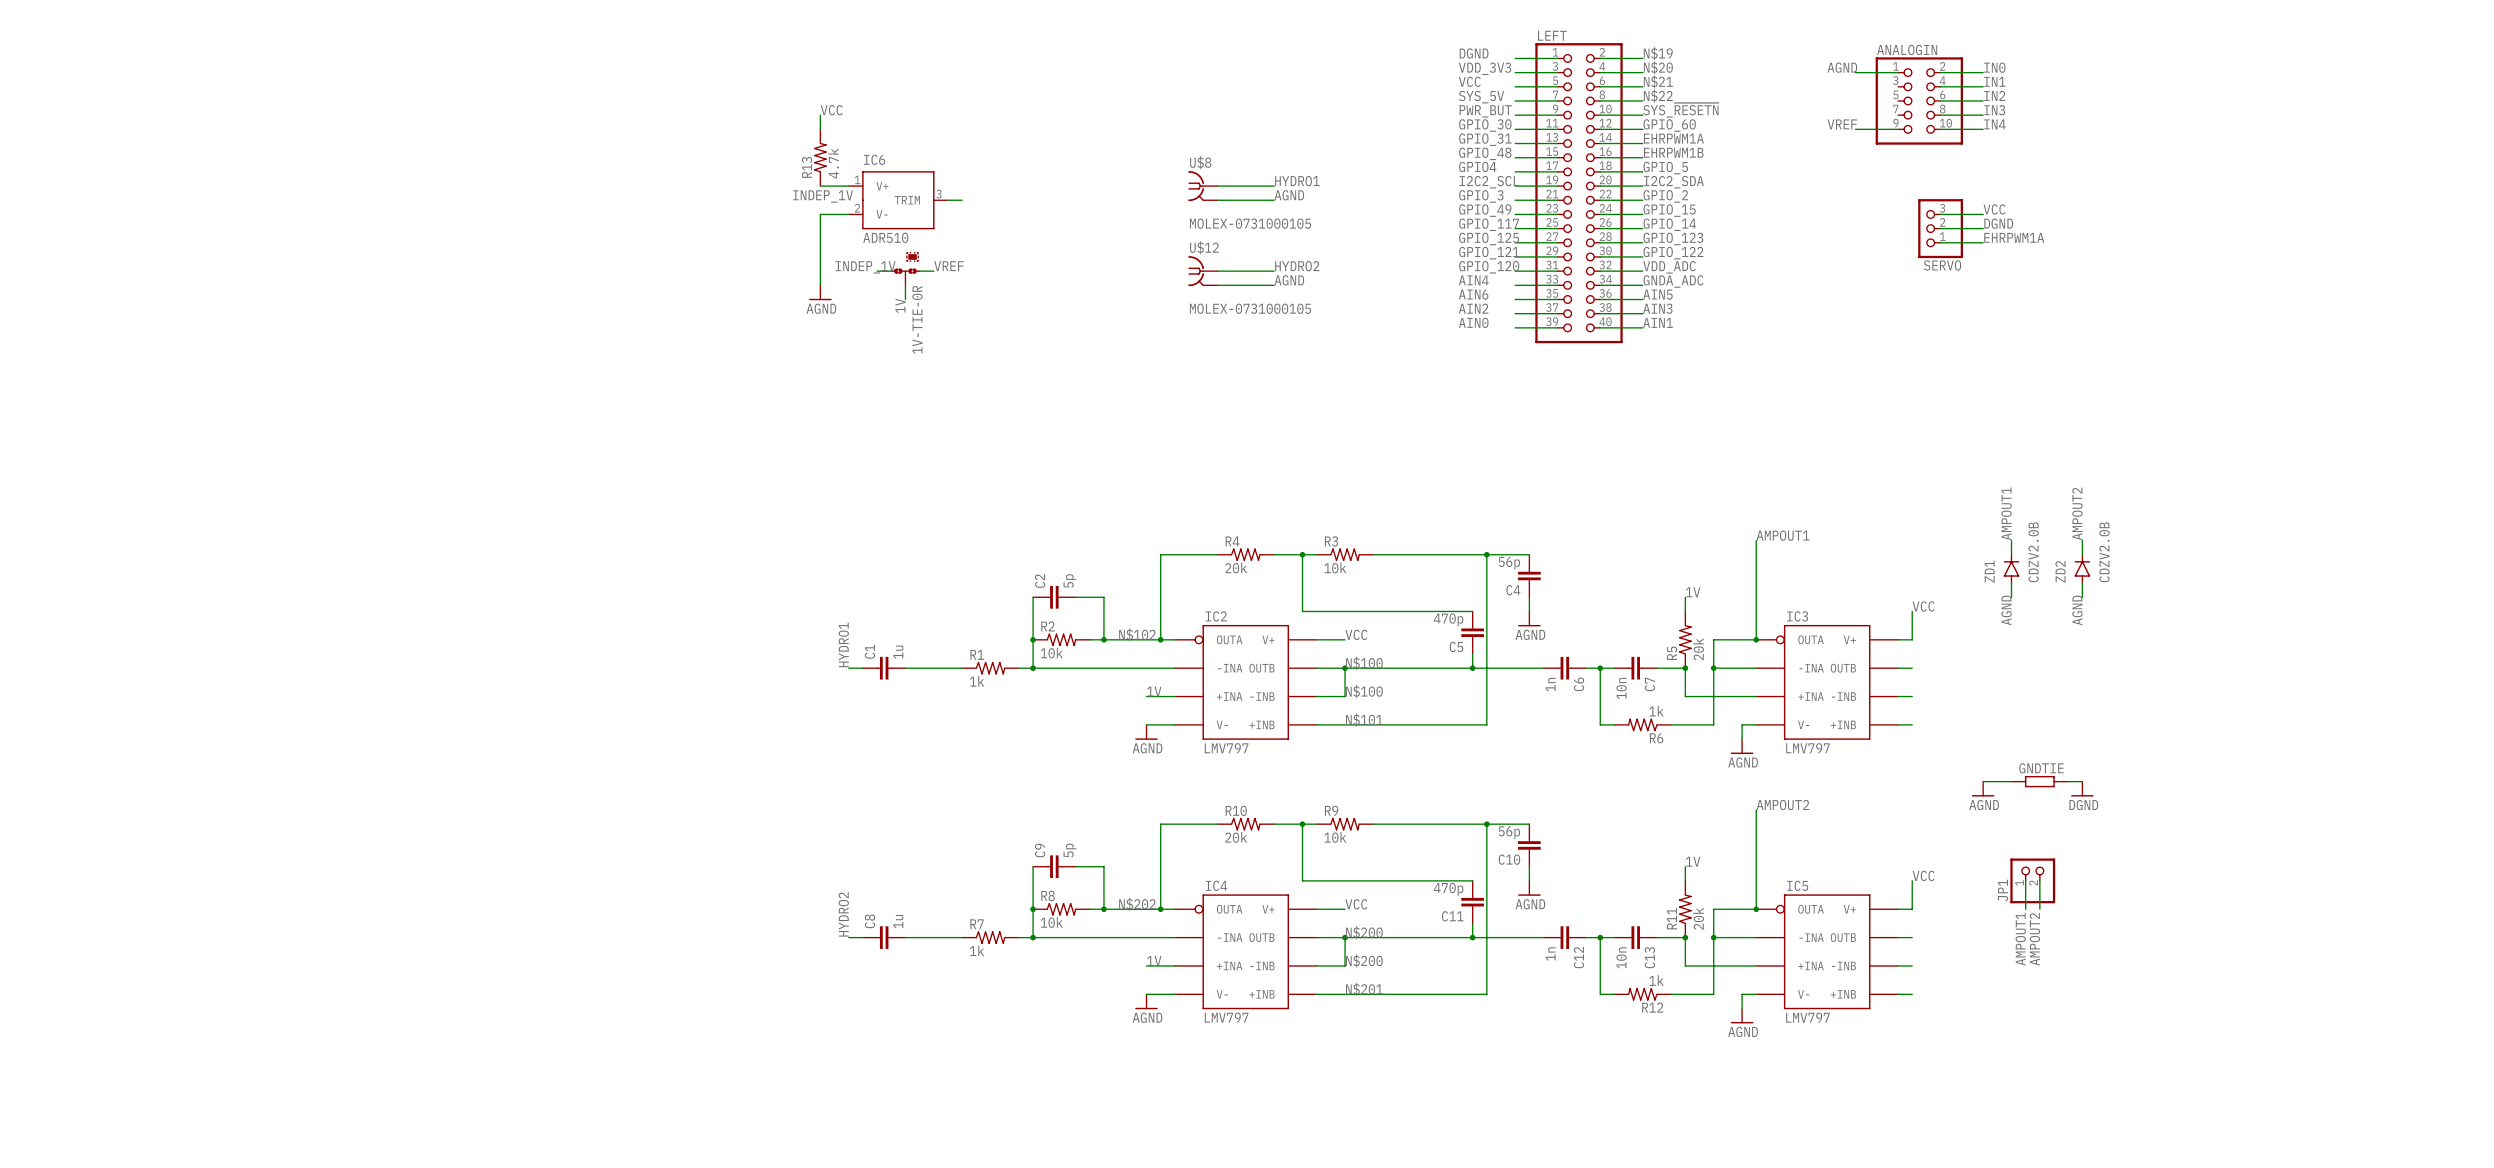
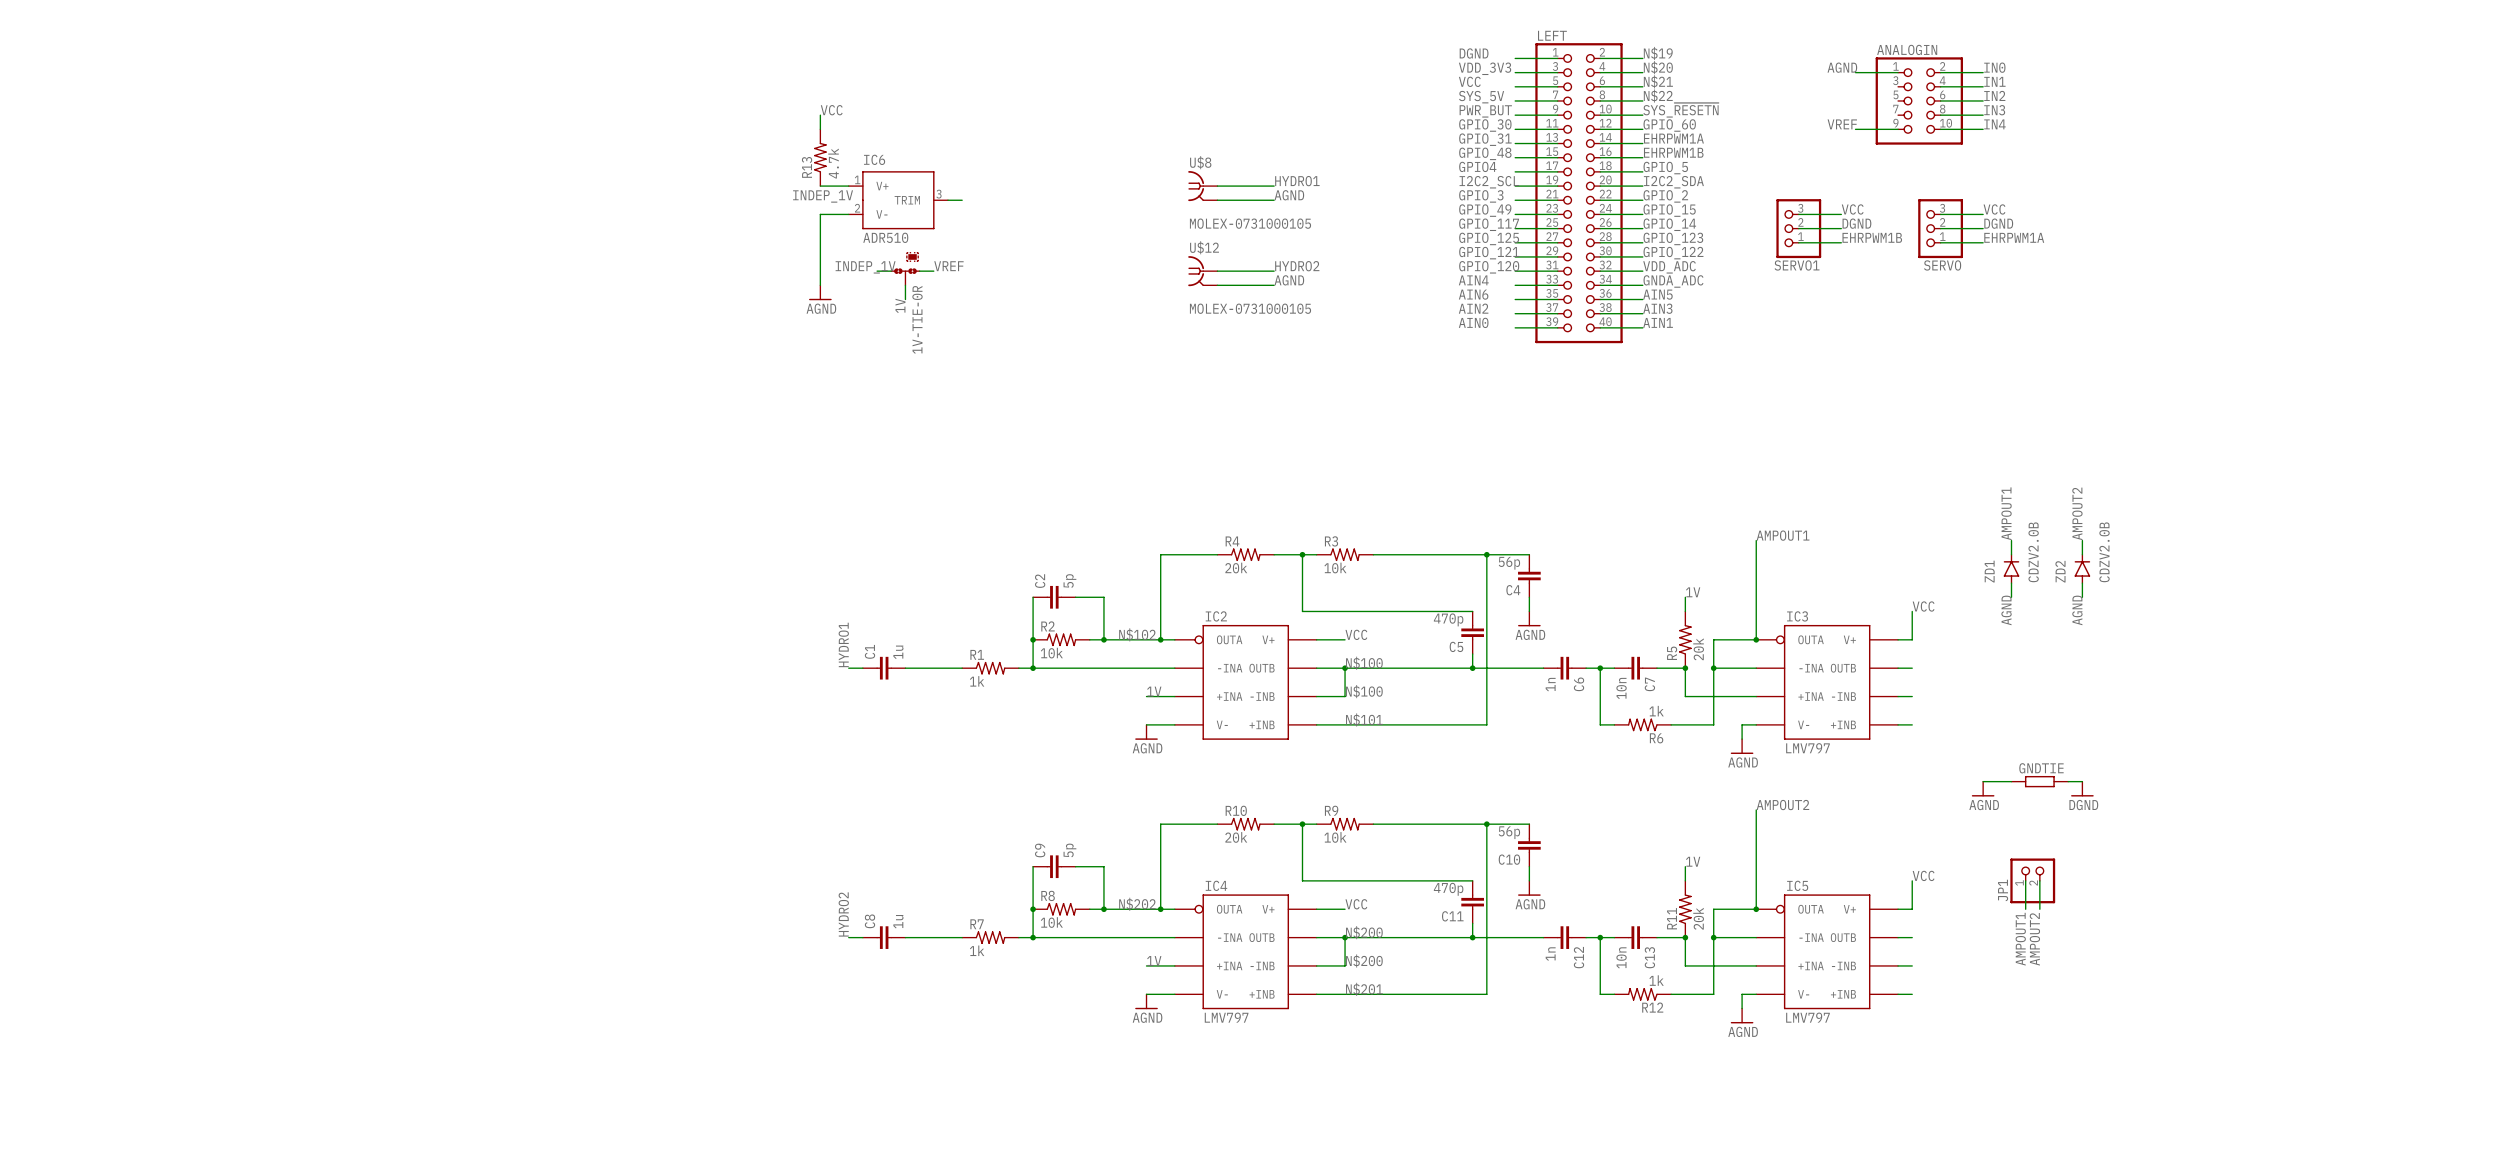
label: none -> VCC (1852, 209)
wire: none -> (1798, 214) (1841, 214)
label: none -> DGND (1856, 223)
wire: none -> (1798, 228) (1841, 228)
SERVO1: none -> (1798, 228)
label: none -> EHRPWM1B (1872, 237)
wire: none -> (1798, 242) (1841, 242)
IC2 value: LMV797 (1226, 748) -> none

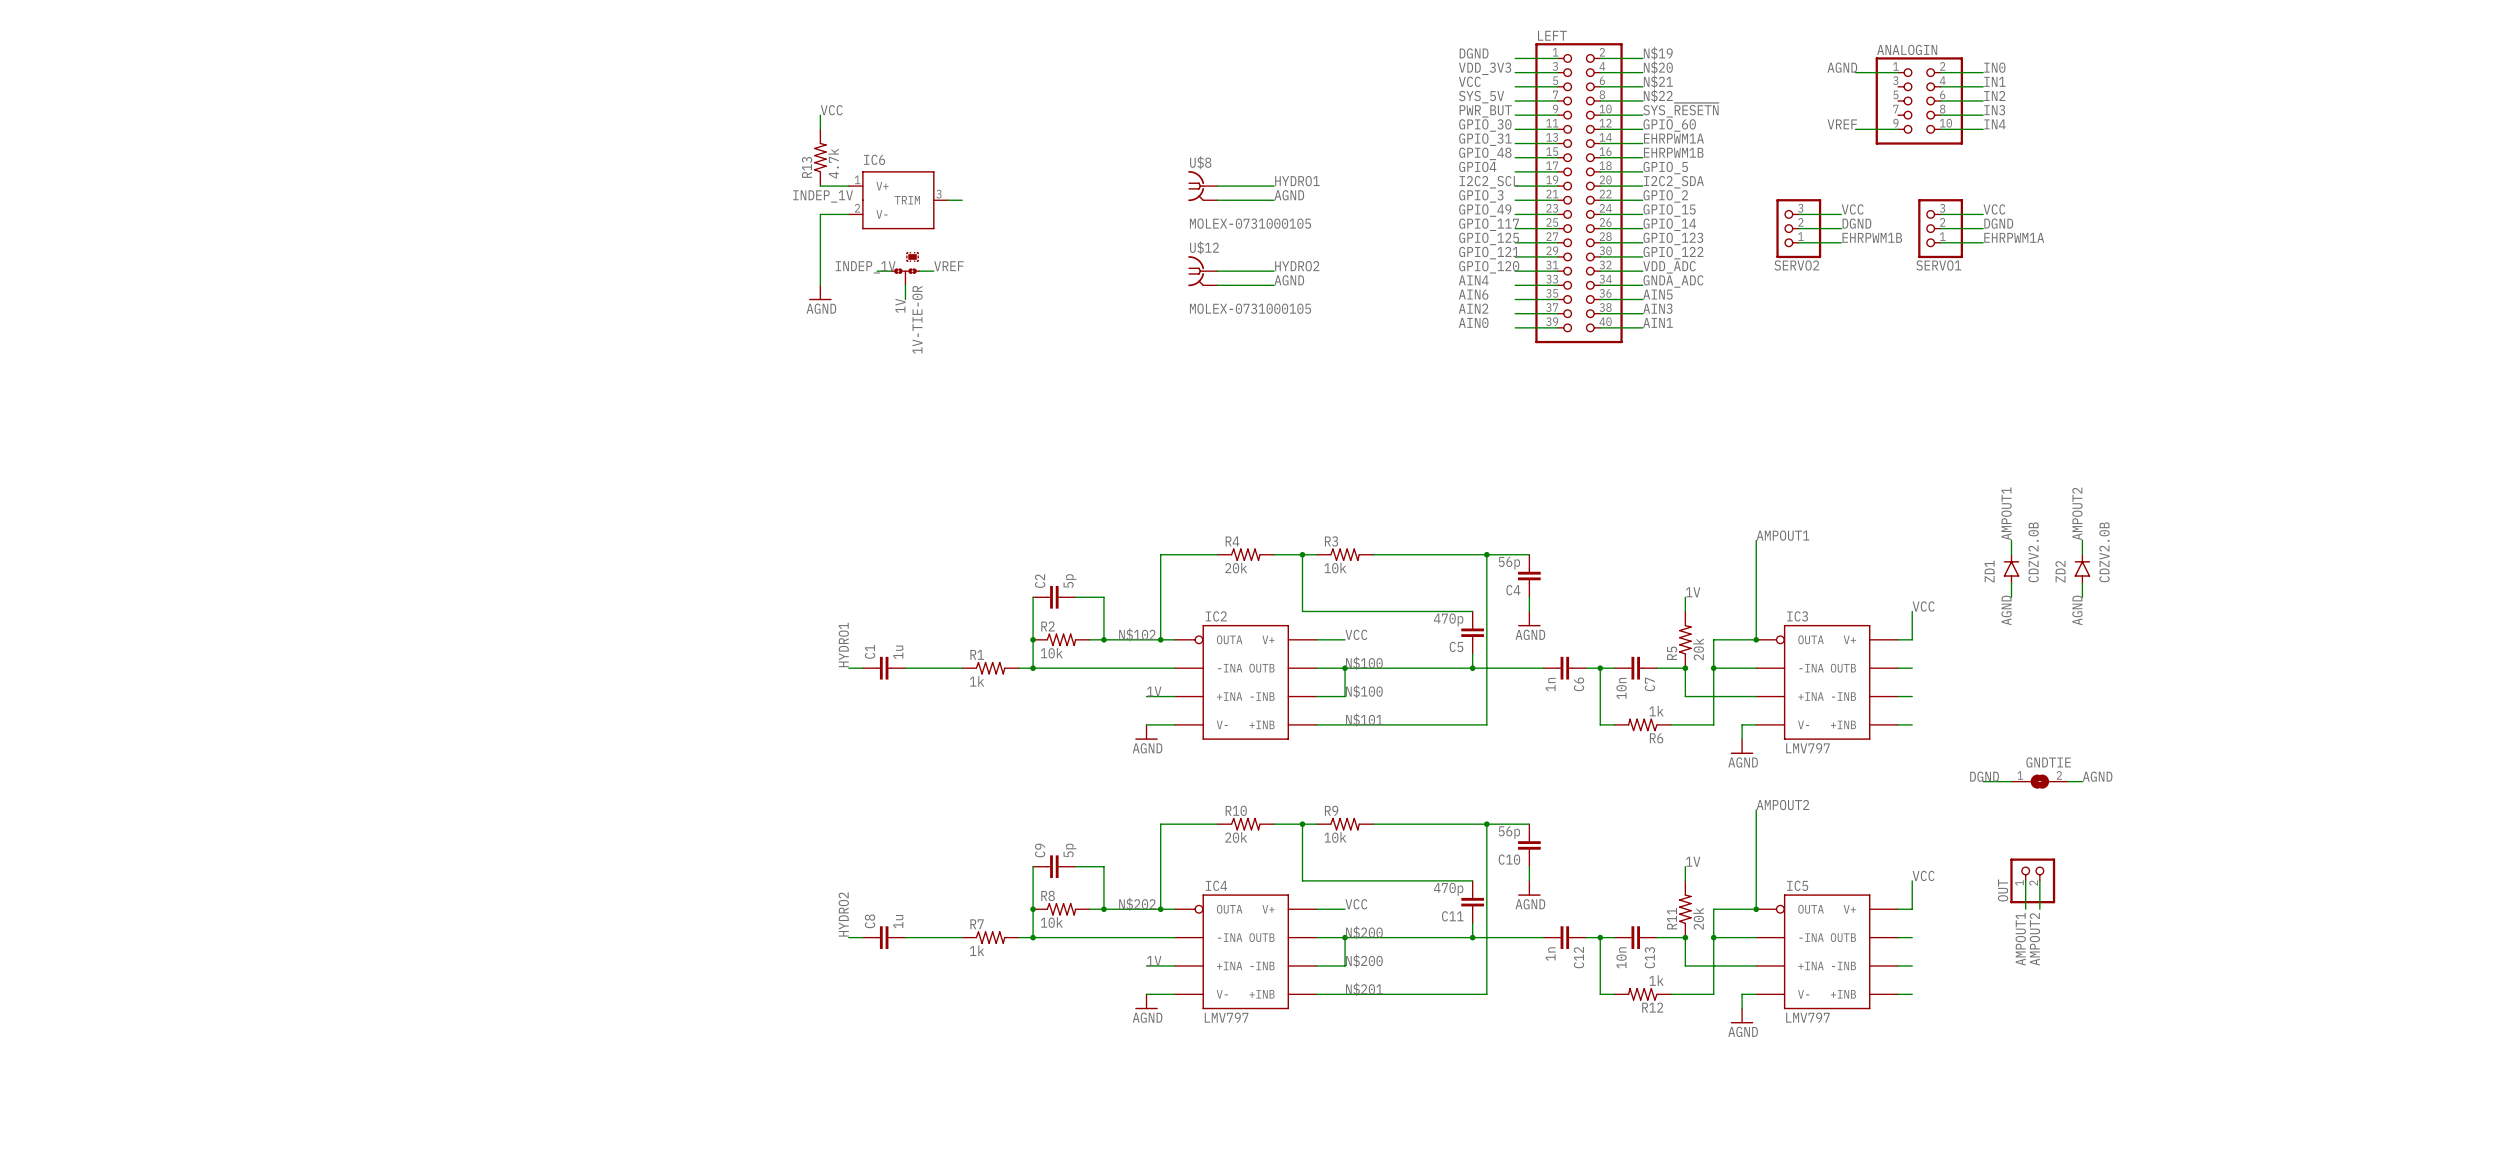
IC6 value: ADR510 (885, 237) -> none
SERVO1 name: SERVO1 (1797, 265) -> SERVO2 (1796, 265)
SERVO name: SERVO (1942, 265) -> SERVO1 (1938, 265)
GNDTIE symbol: [2011, 775, 2069, 788] -> [2011, 774, 2069, 789]
label: none -> DGND (1984, 776)
label: none -> AGND (2097, 776)
power symbol: AGND (1983, 789) -> none
power symbol: DGND (2082, 789) -> none
JP1 name: JP1 (2003, 890) -> OUT (2002, 890)

